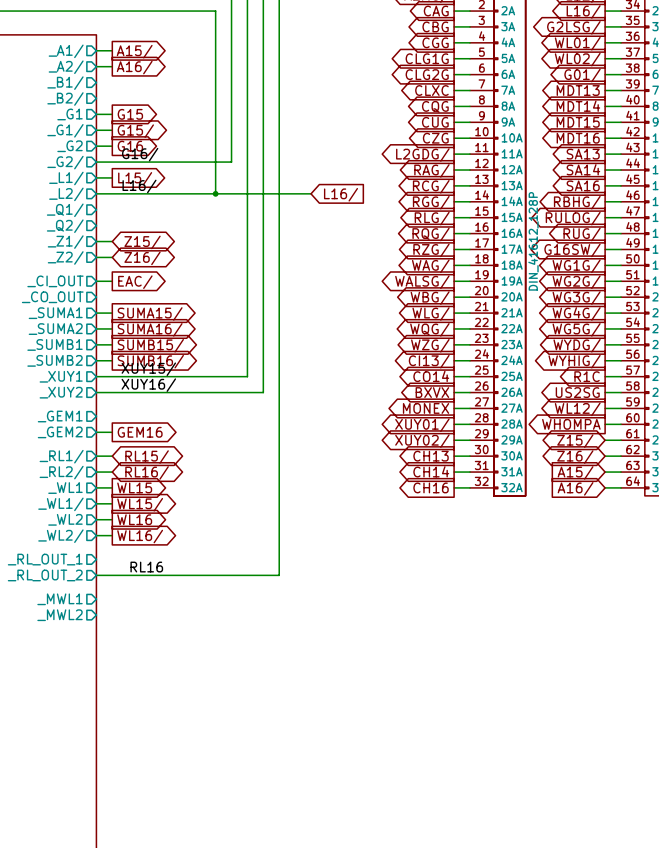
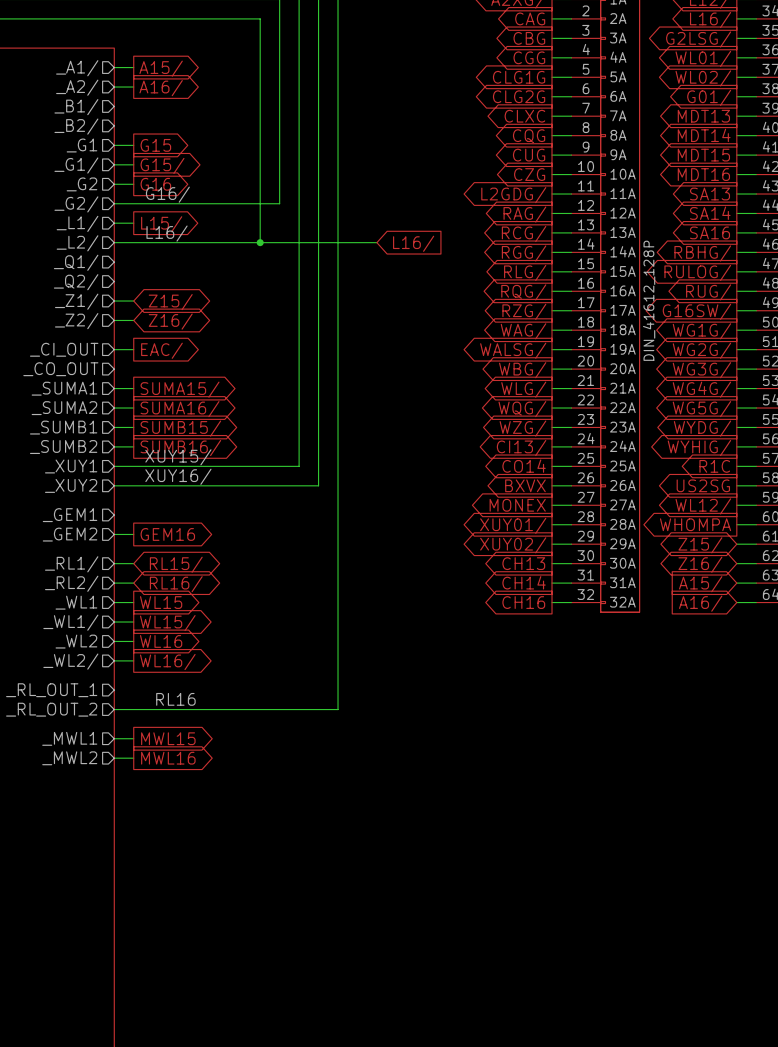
wire: none -> (114, 738) (133, 738)
global label: none -> MWL15 (168, 738)
wire: none -> (114, 758) (133, 758)
global label: none -> MWL16 (168, 758)

